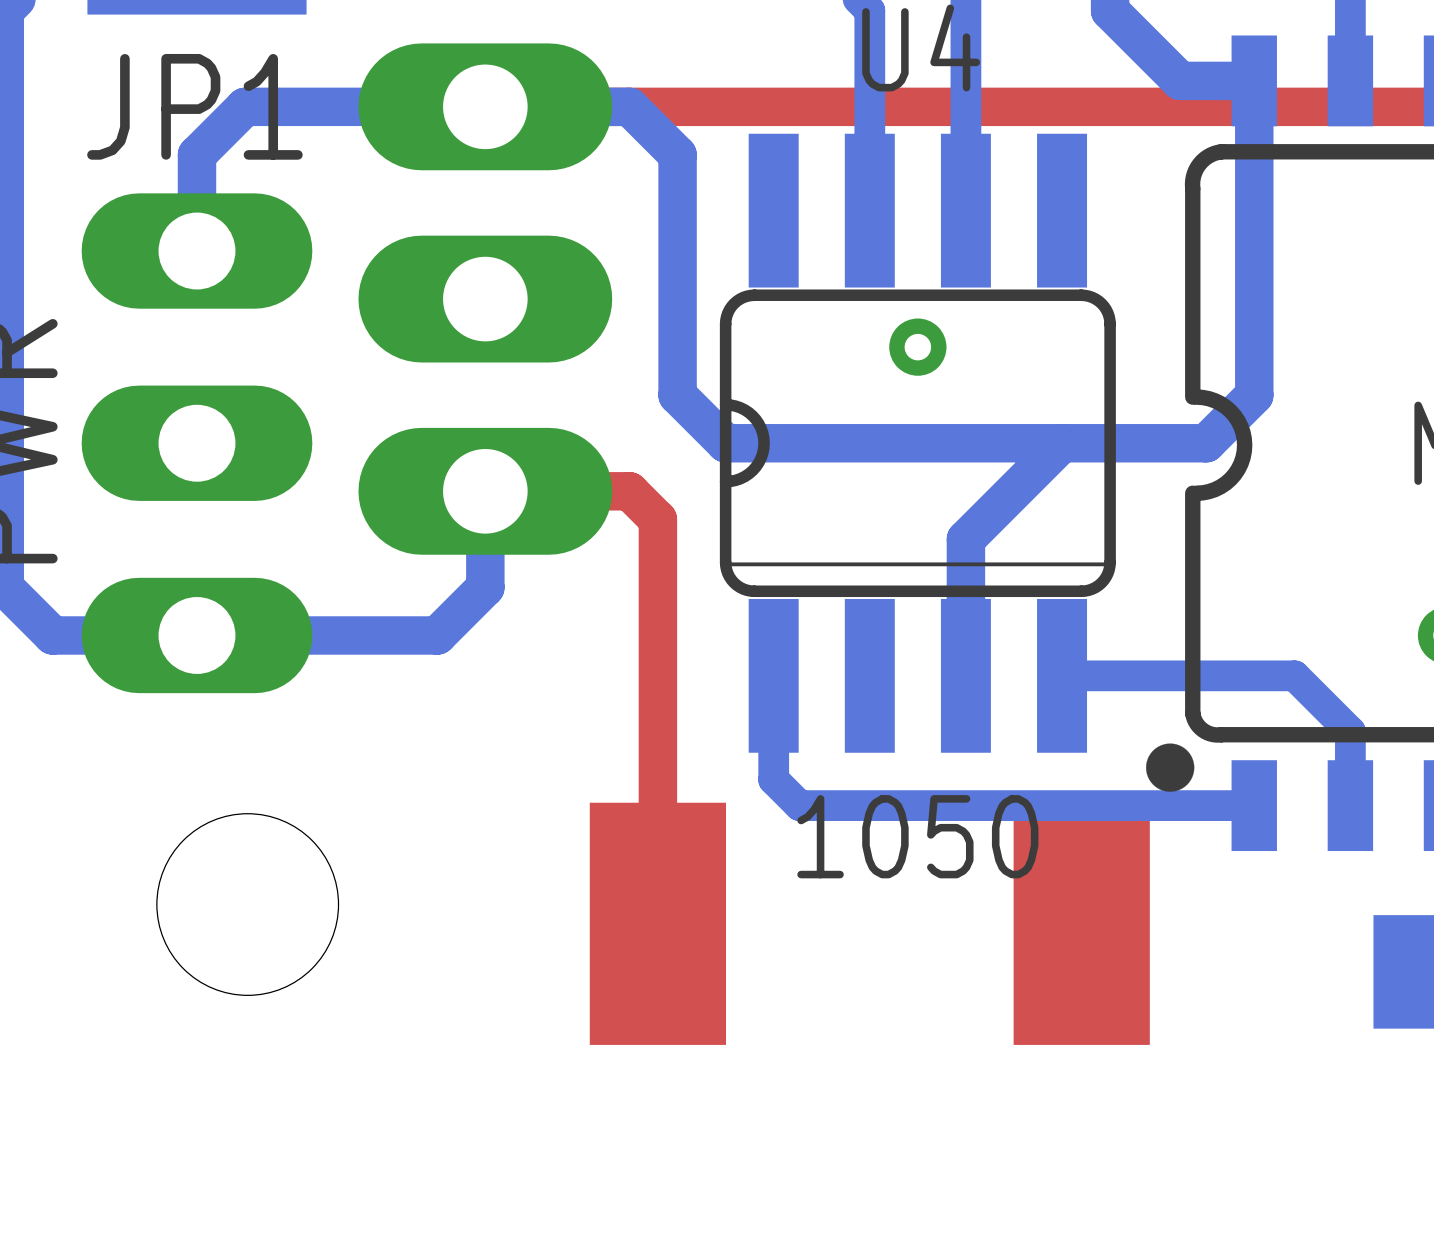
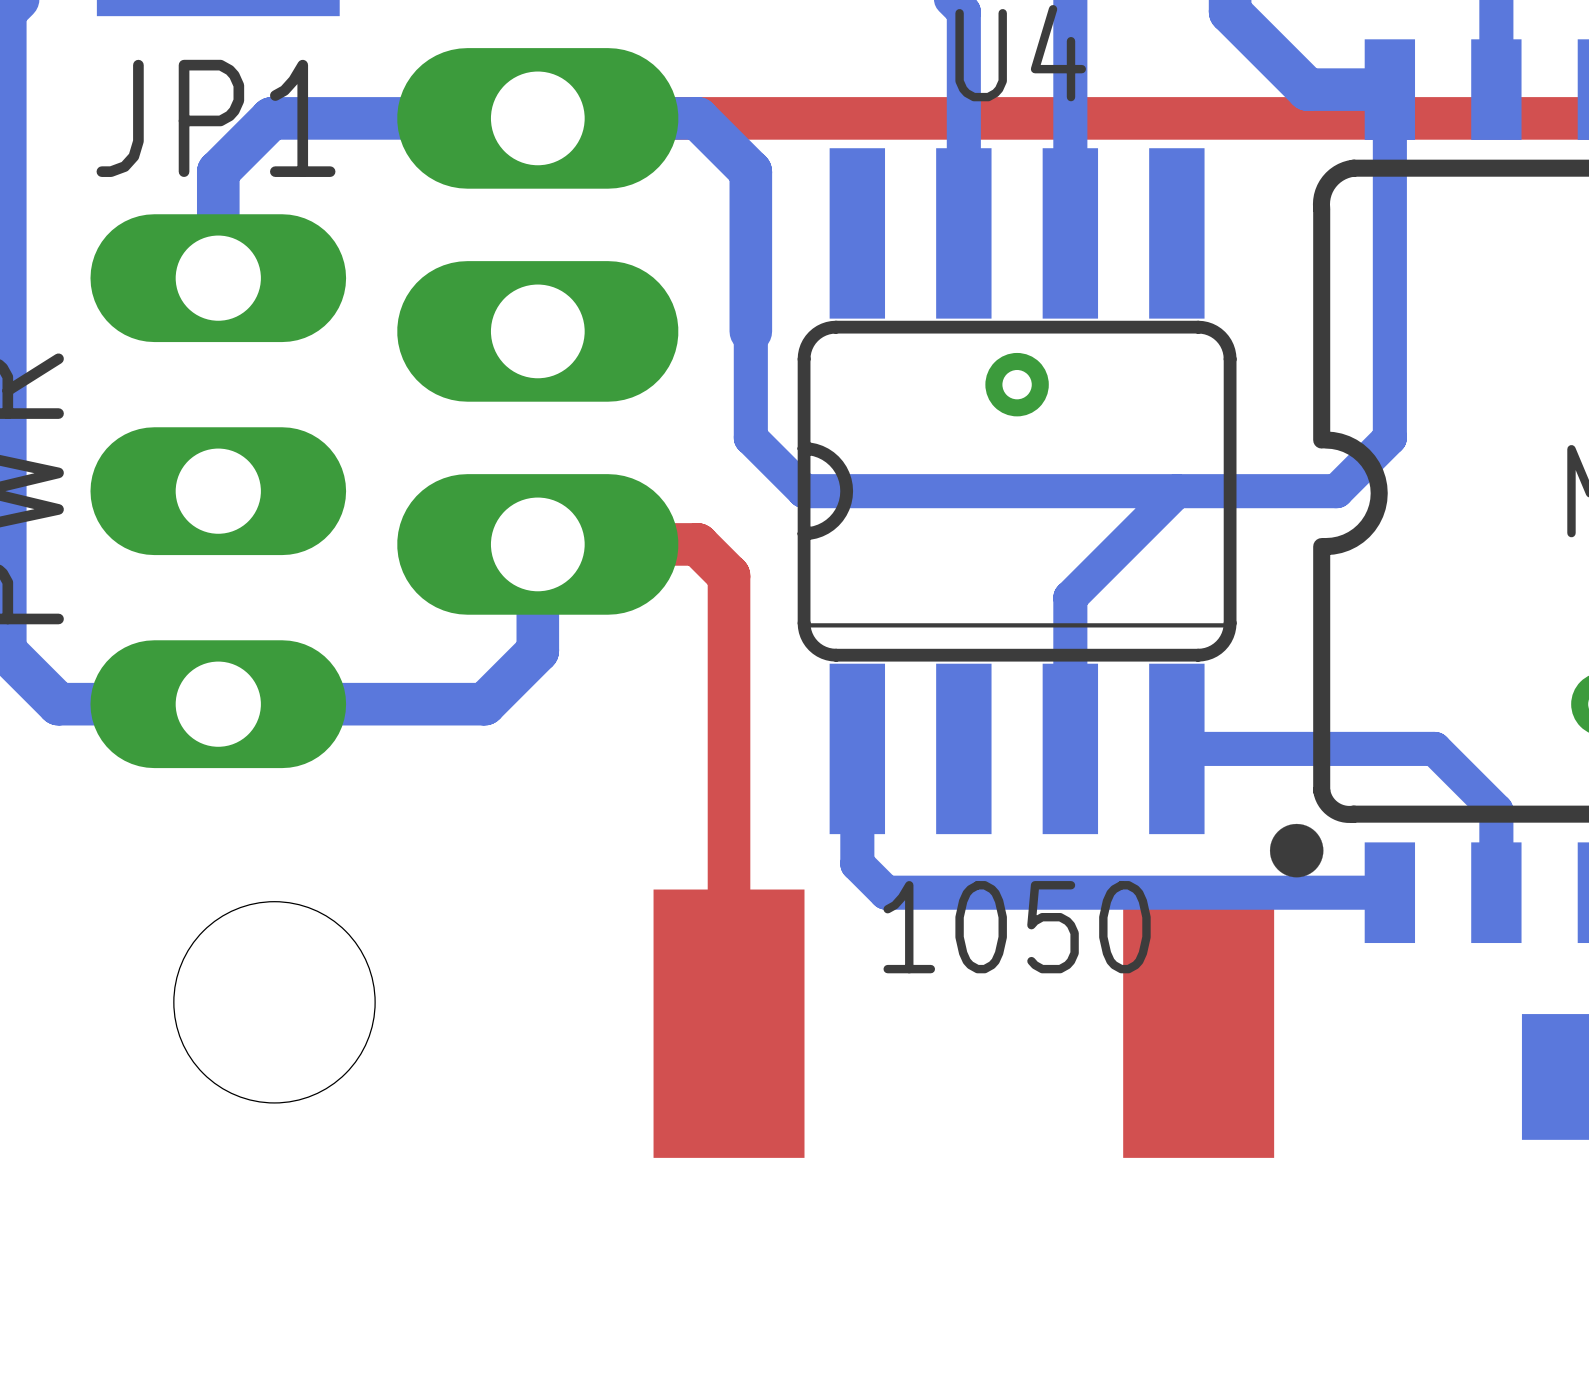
bottom track width: thick (1254, 58) (1254, 395) (1206, 443) (725, 443) (677, 395) (677, 299) -> thin (1389, 65) (1389, 437) (1336, 491) (804, 491) (750, 437) (750, 331)
bottom track width: thick (1062, 443) (965, 539) (965, 675) -> thin (1176, 491) (1070, 597) (1070, 748)

